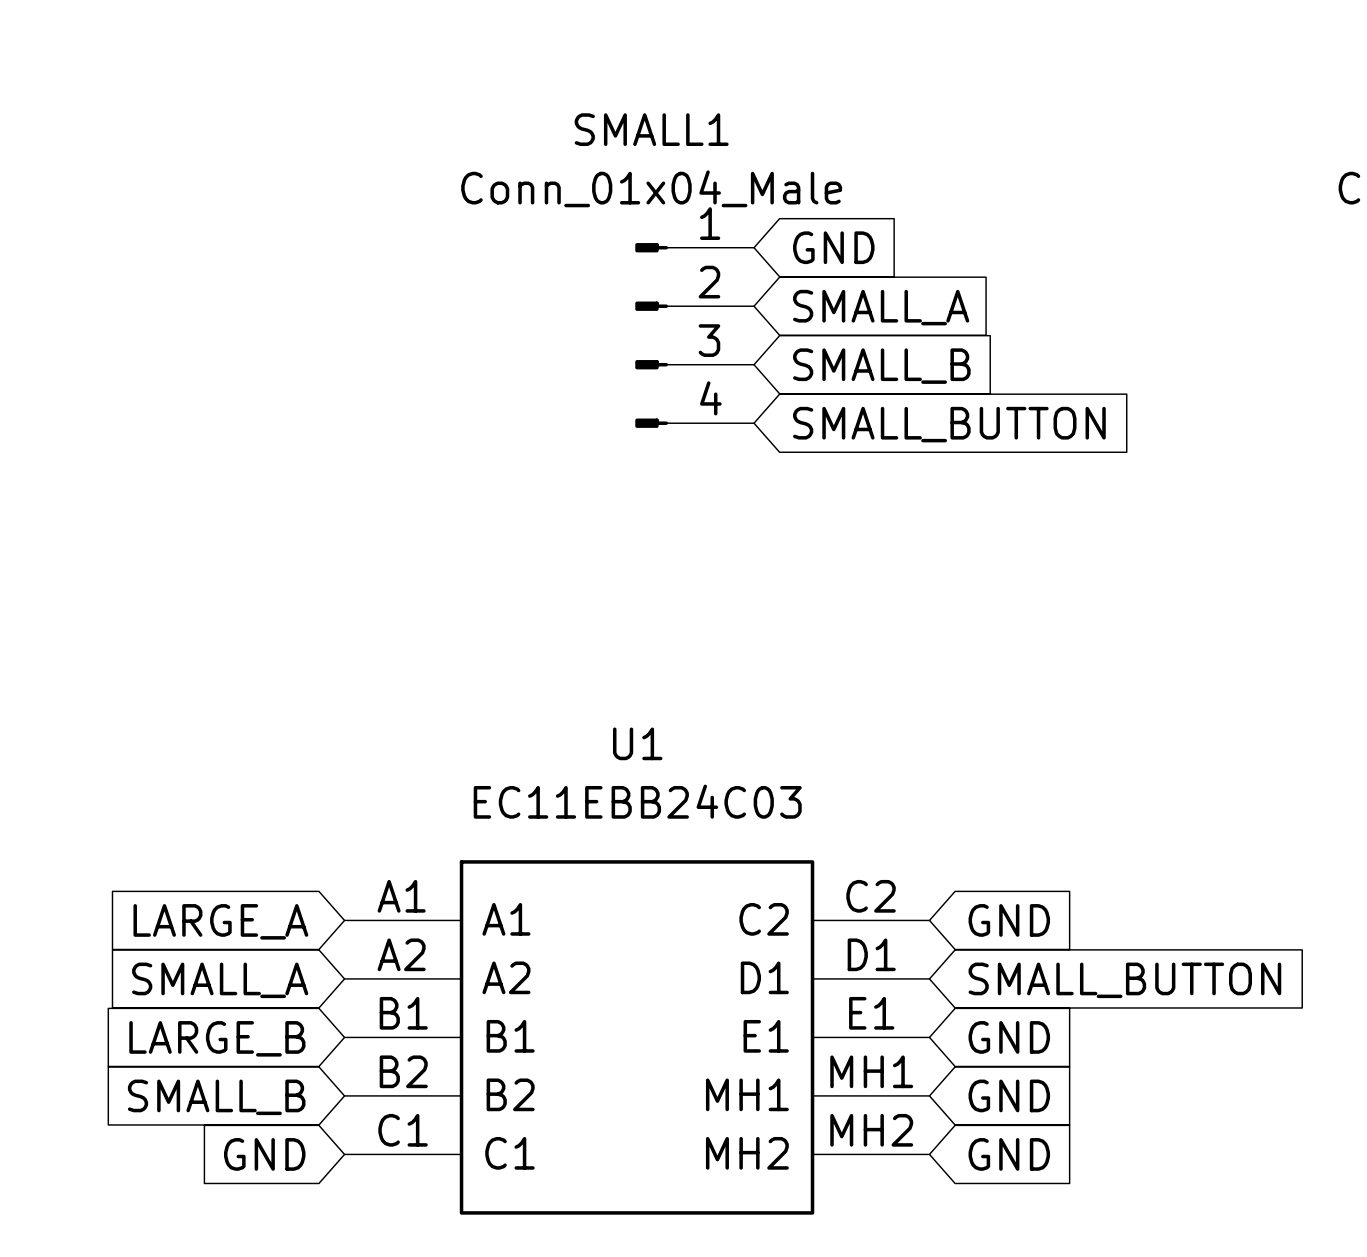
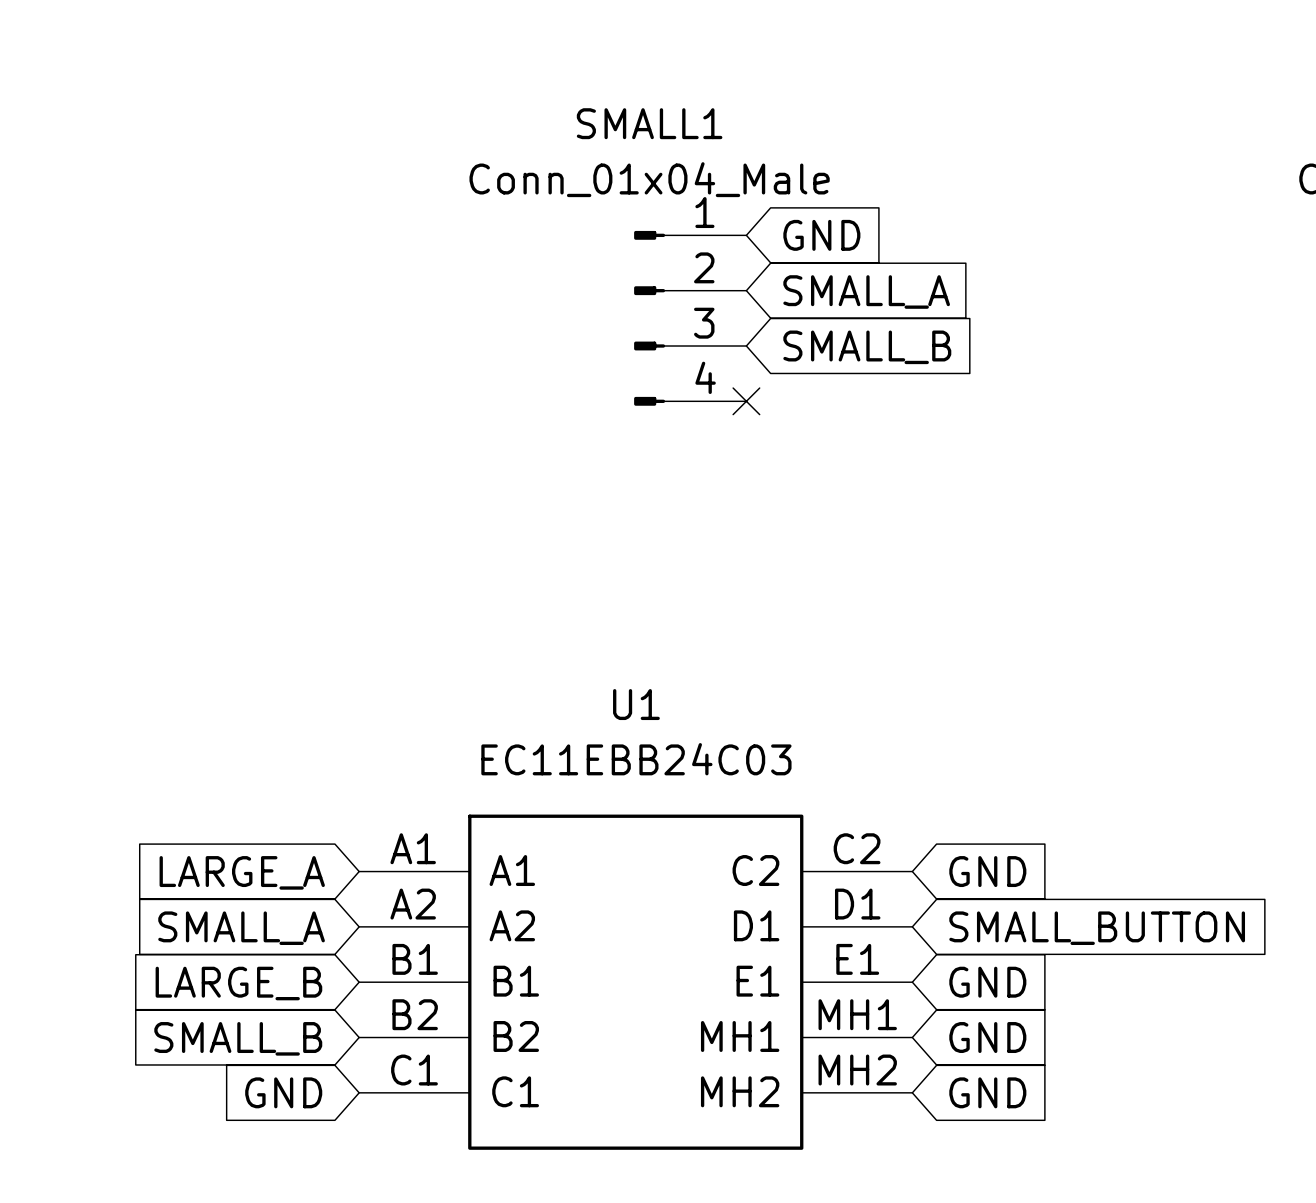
no-connect mark: none -> (746, 401)
global label: SMALL_BUTTON (949, 424) -> none

